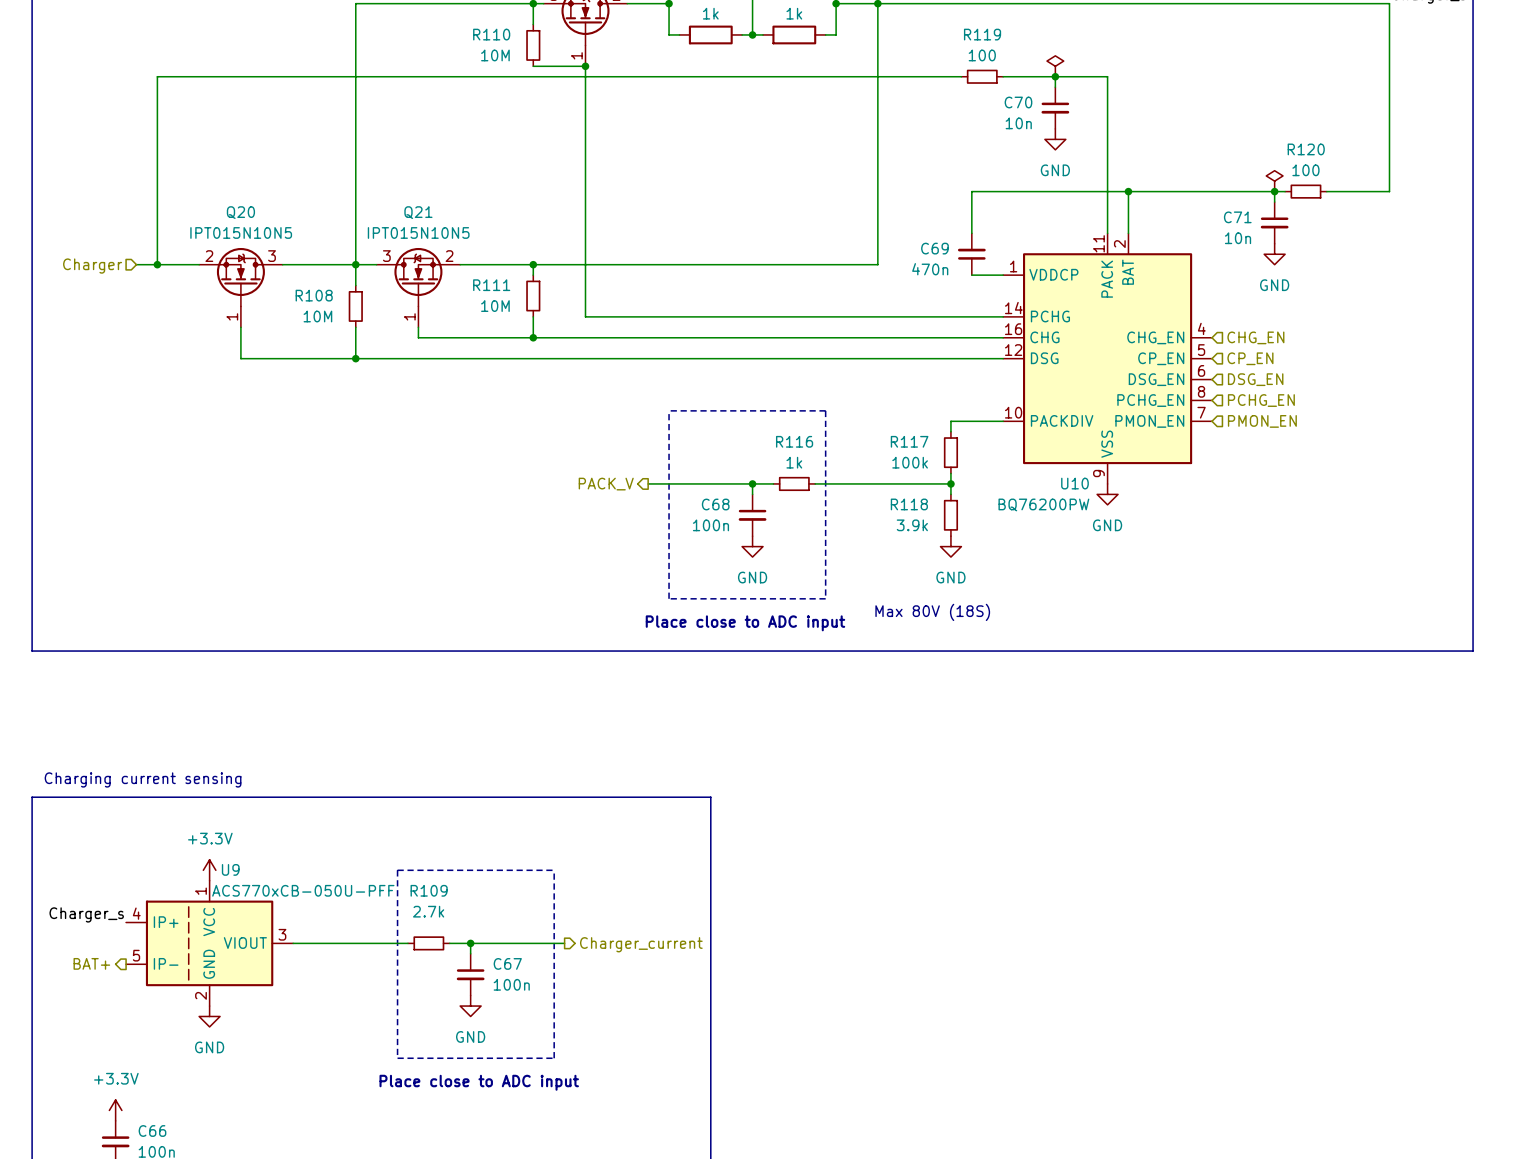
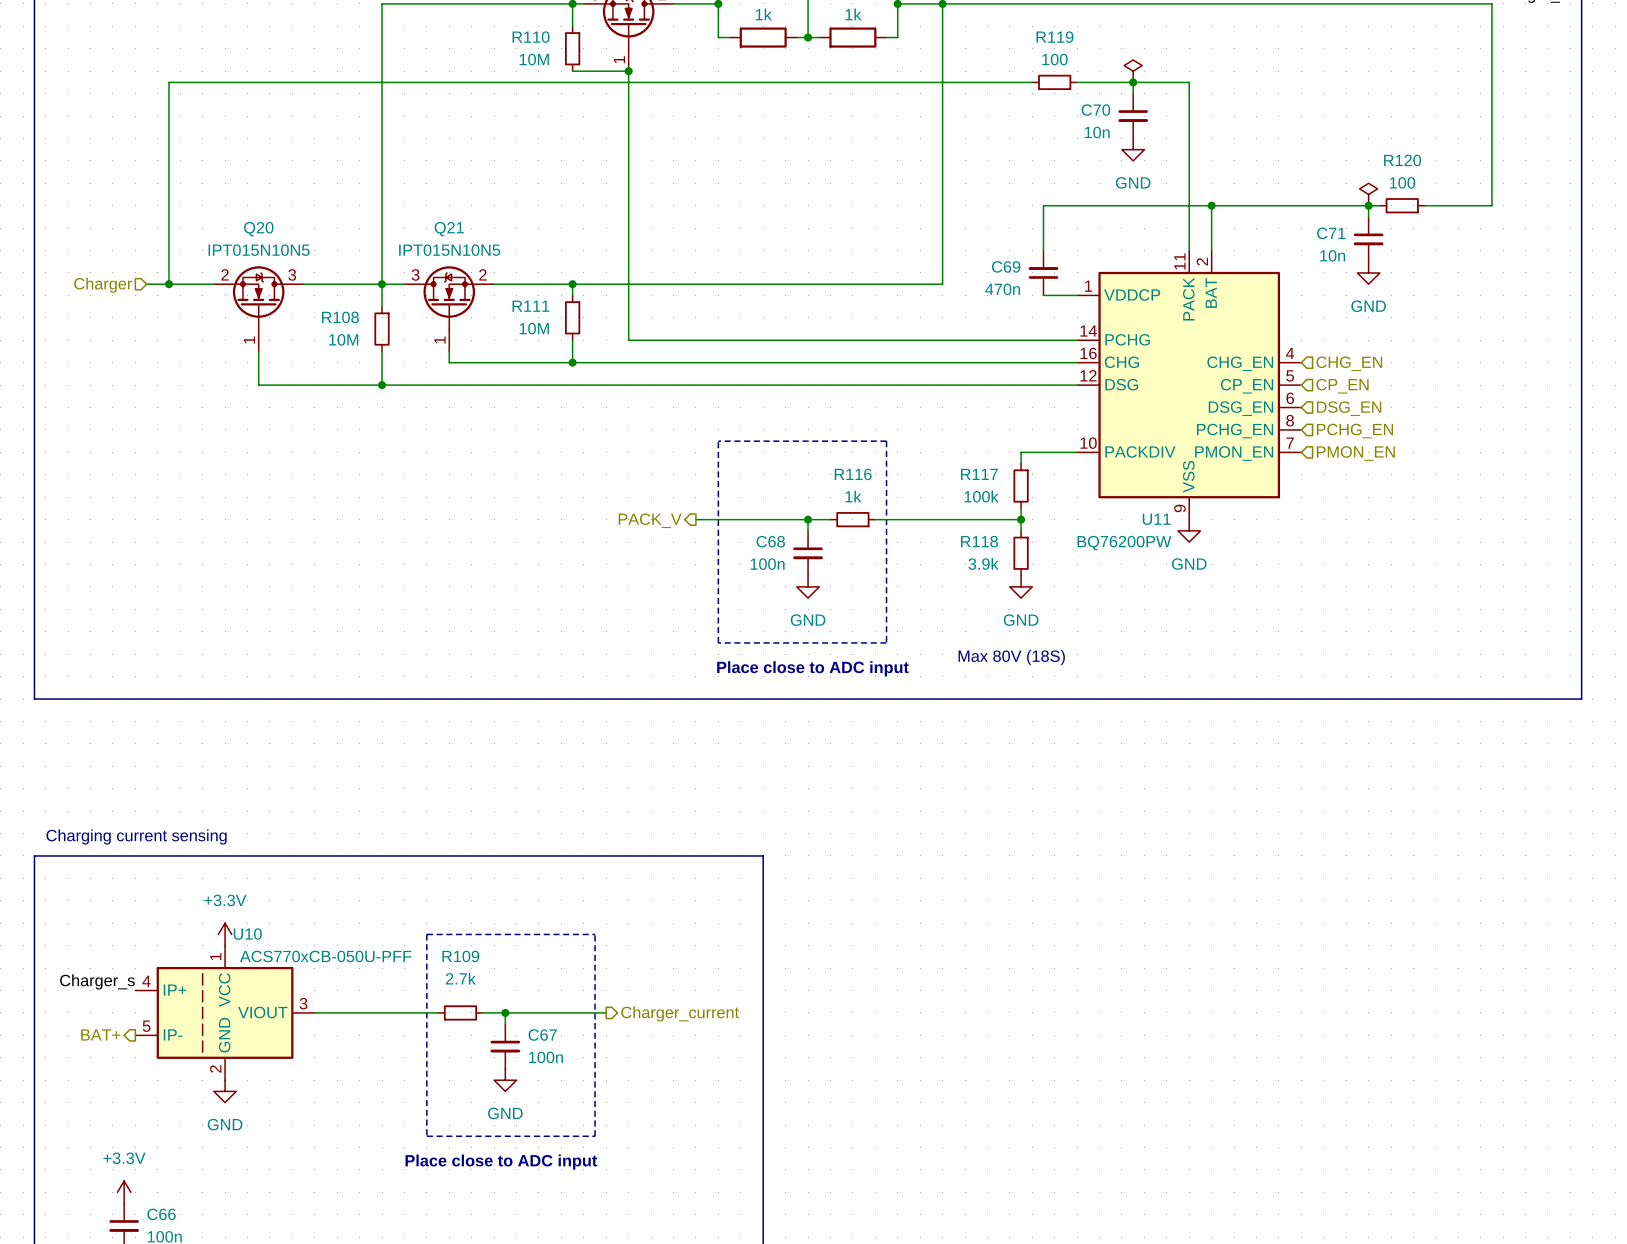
U10 name: U10 (1074, 483) -> U11 (1156, 519)
U9 name: U9 (230, 869) -> U10 (247, 934)

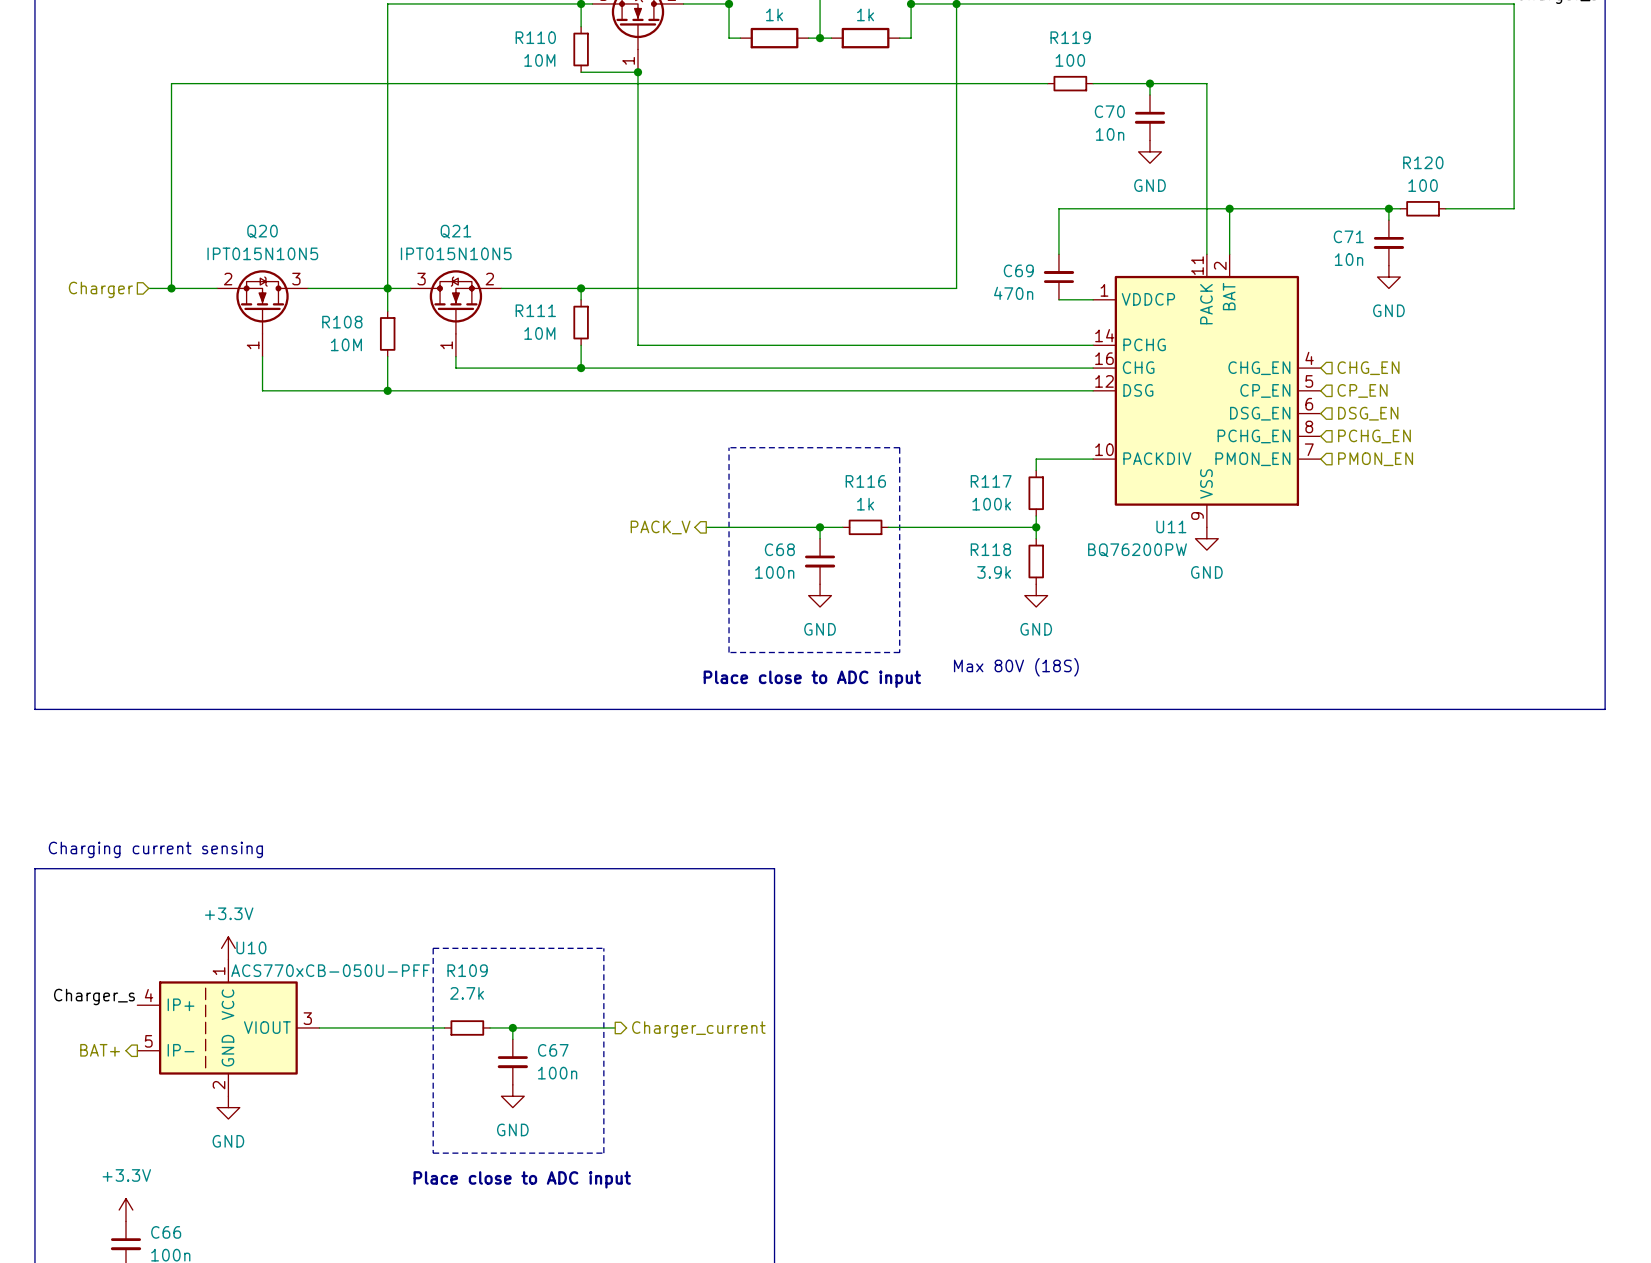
power symbol: (1133, 71) -> none
power symbol: (1368, 194) -> none

